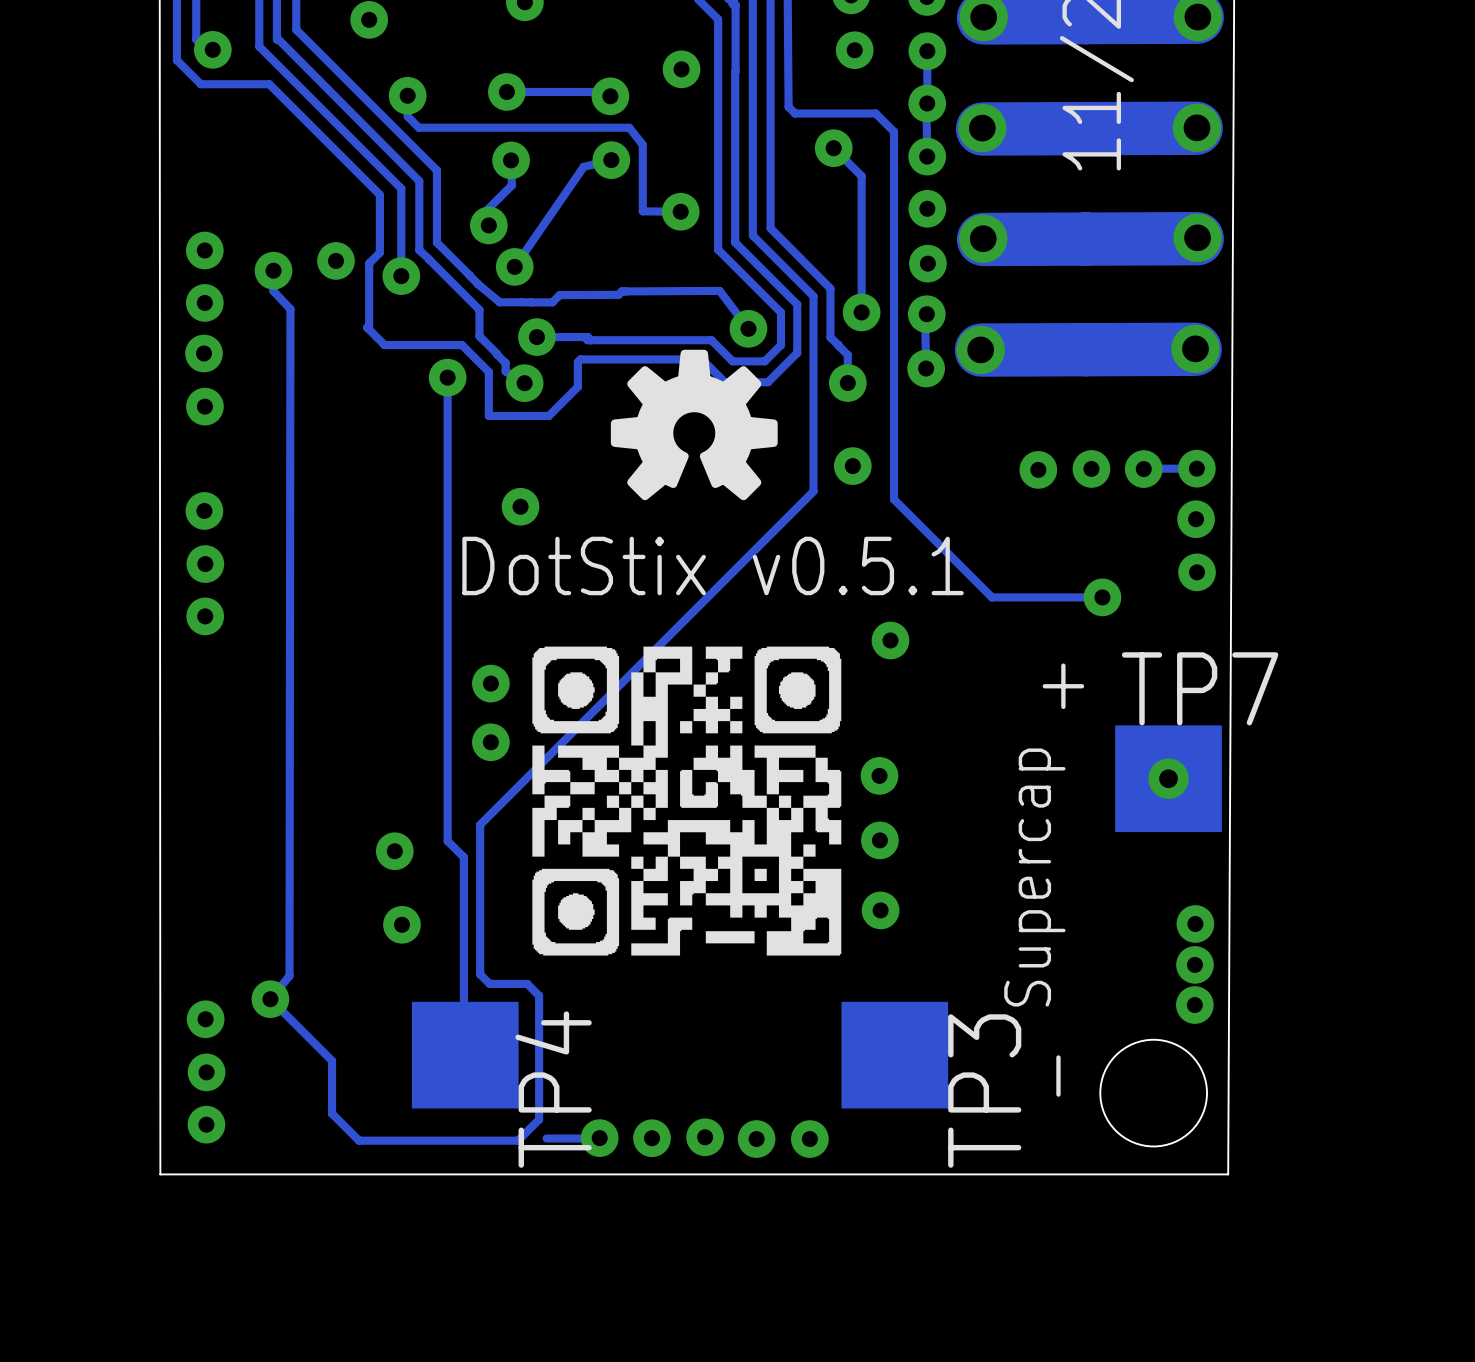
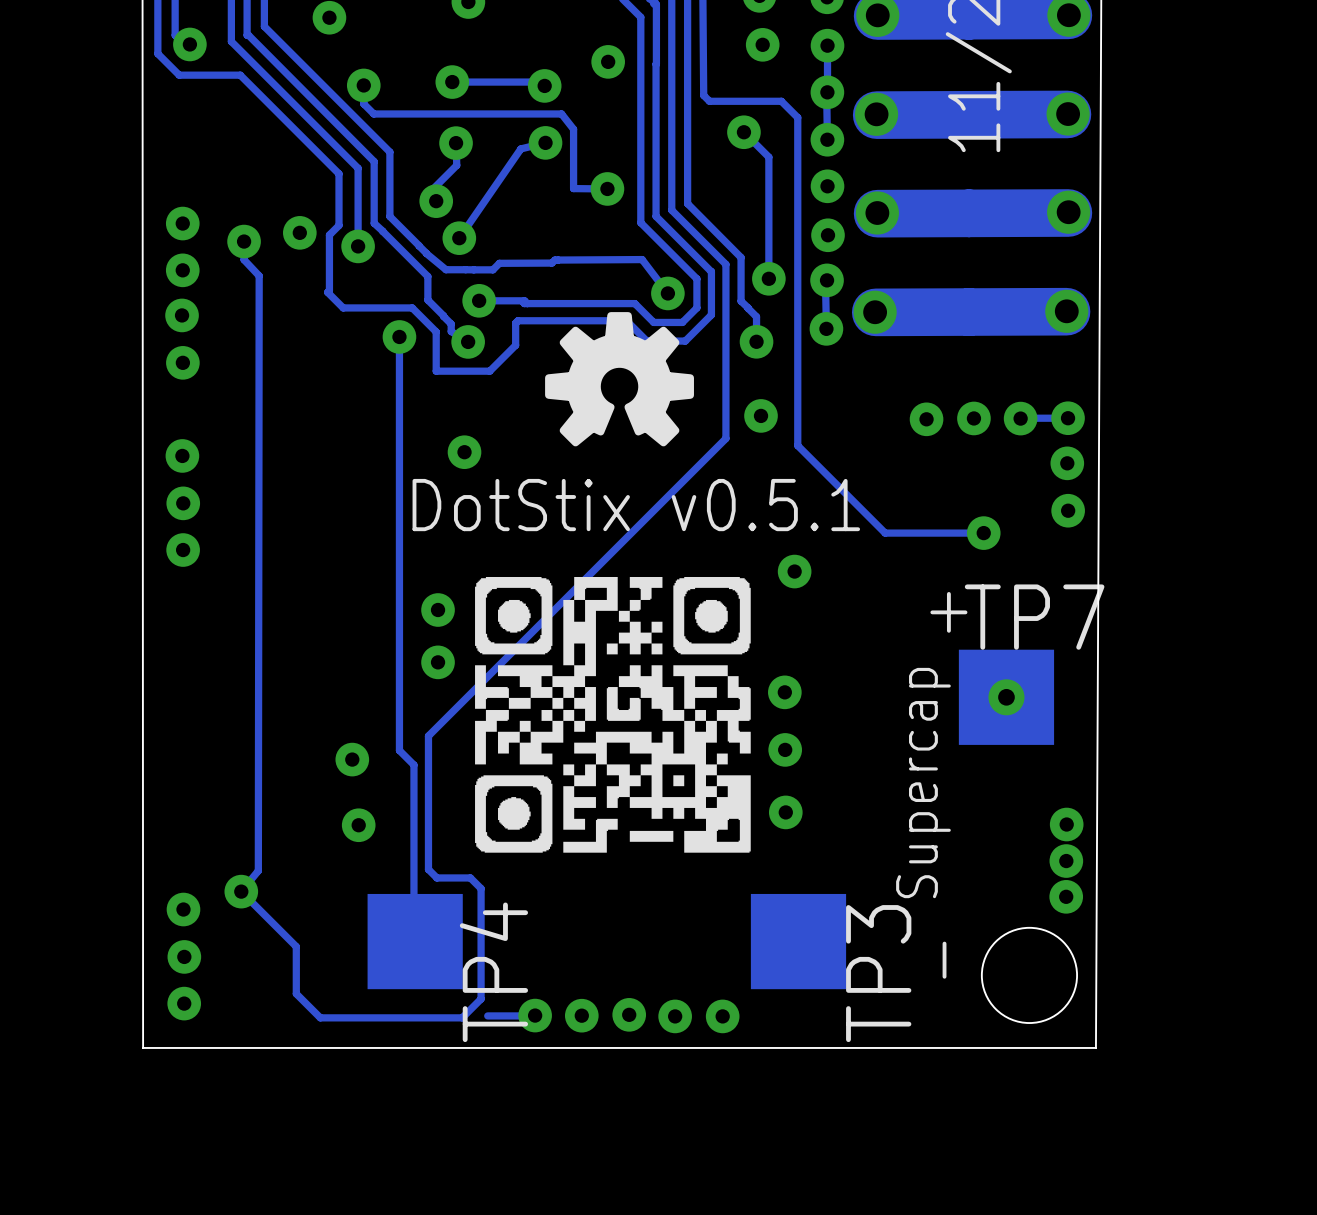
TP7 position: (1168, 778) -> (1006, 697)
via position: (1168, 778) -> (1006, 697)

